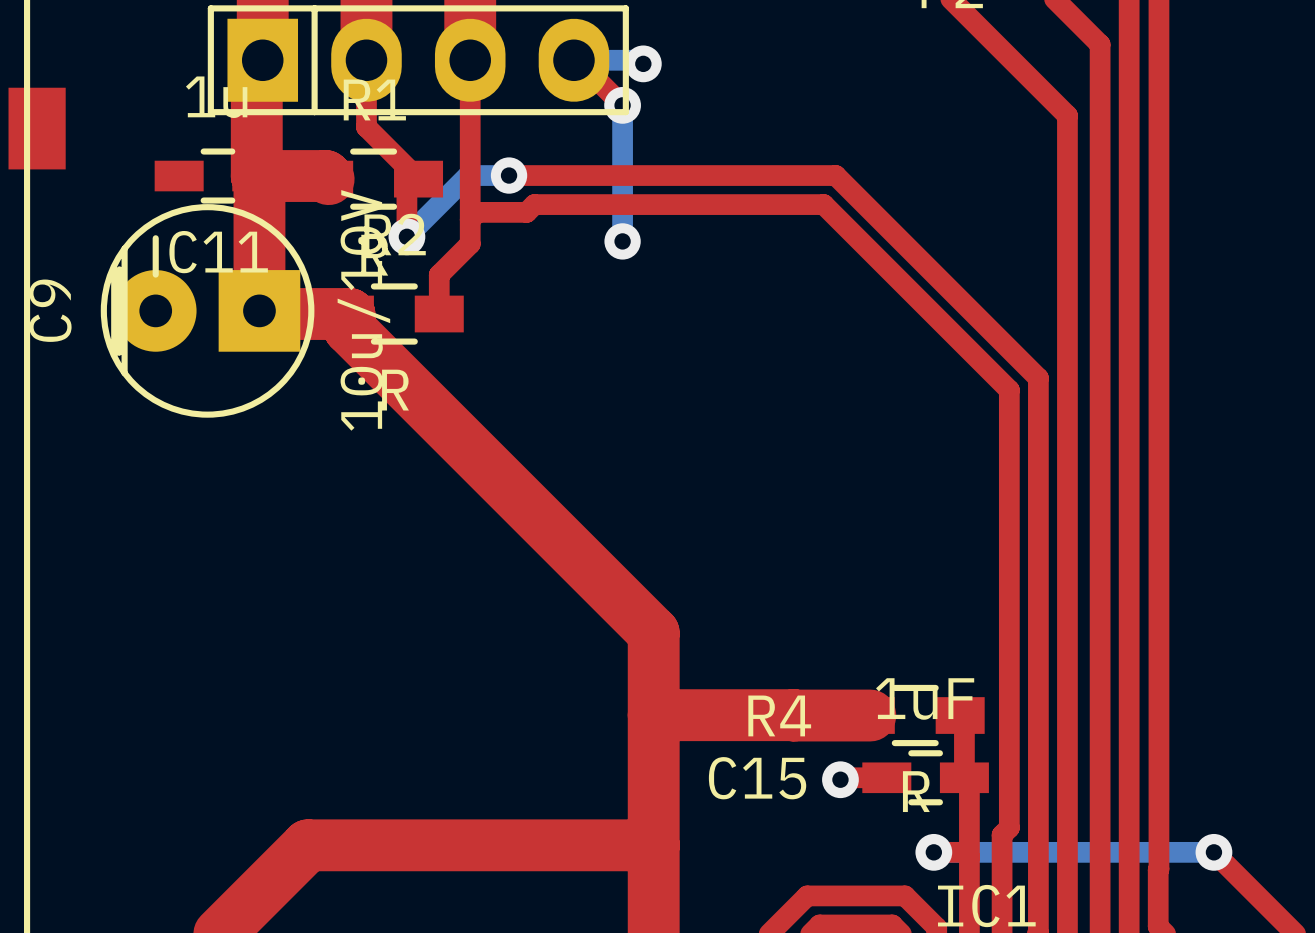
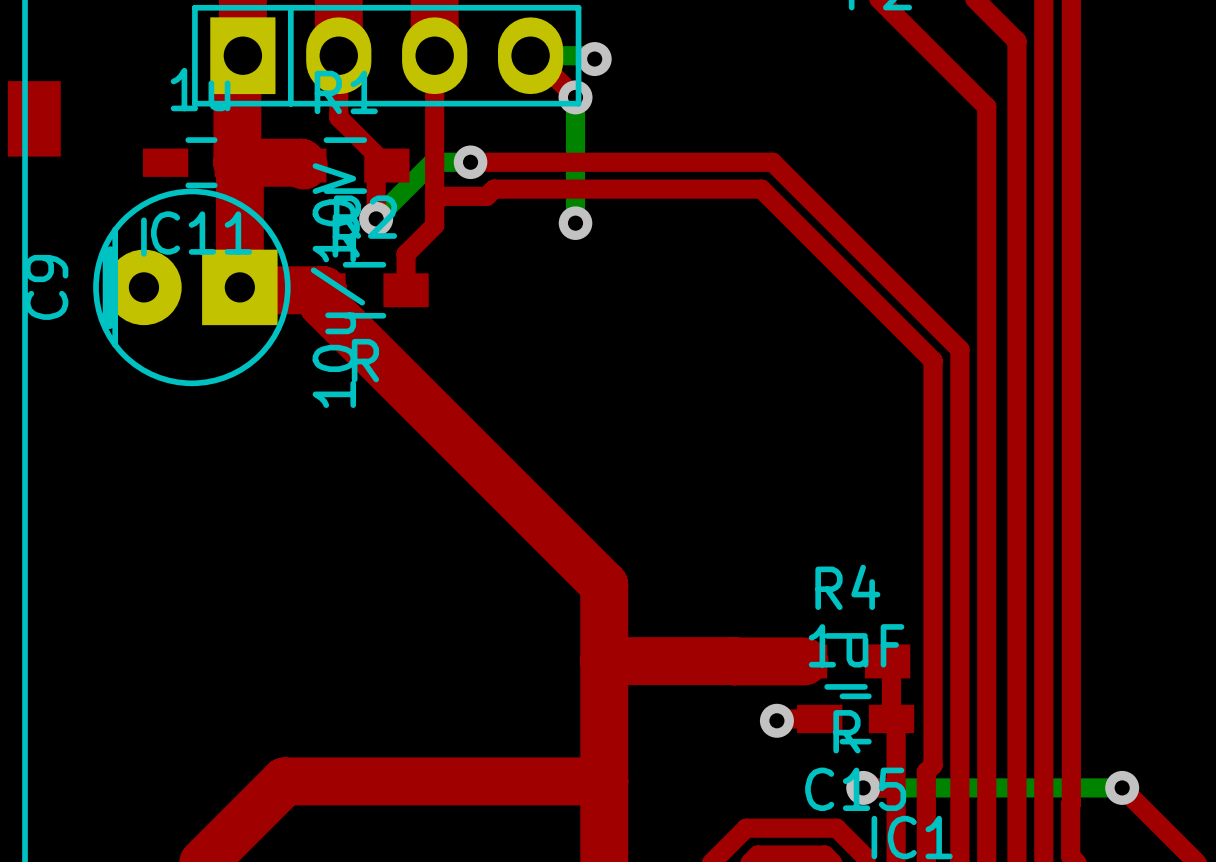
R4 name position: R4 (779, 715) -> R4 (847, 587)
C15 name position: C15 (757, 778) -> C15 (855, 789)

